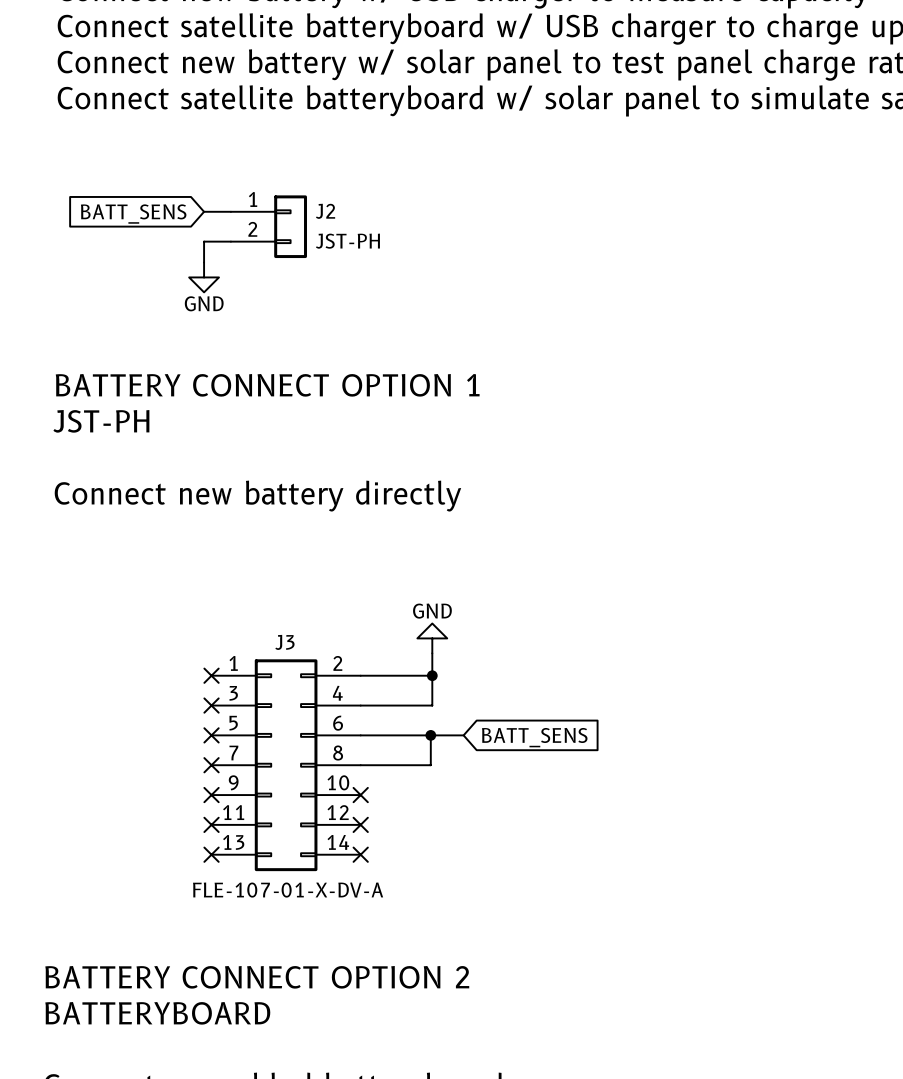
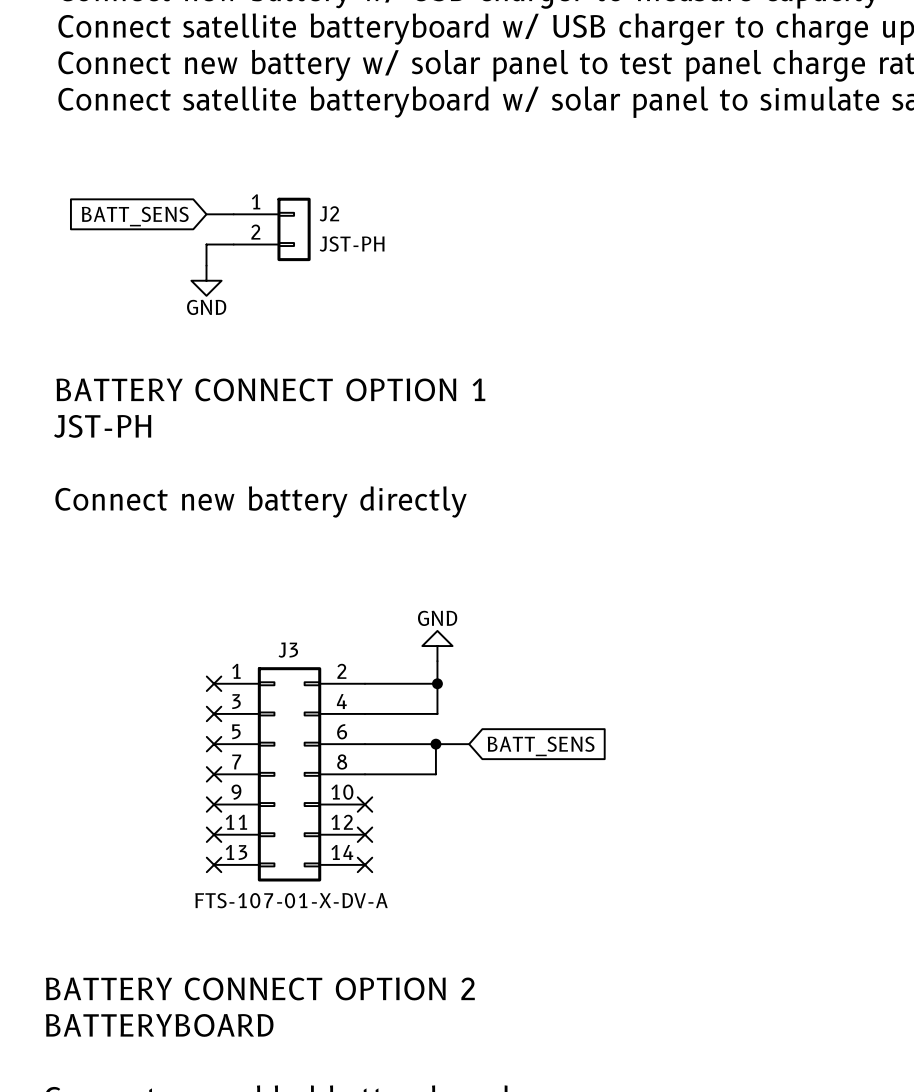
J3 value: FLE-107-01-X-DV-A (288, 890) -> FTS-107-01-X-DV-A (291, 900)

